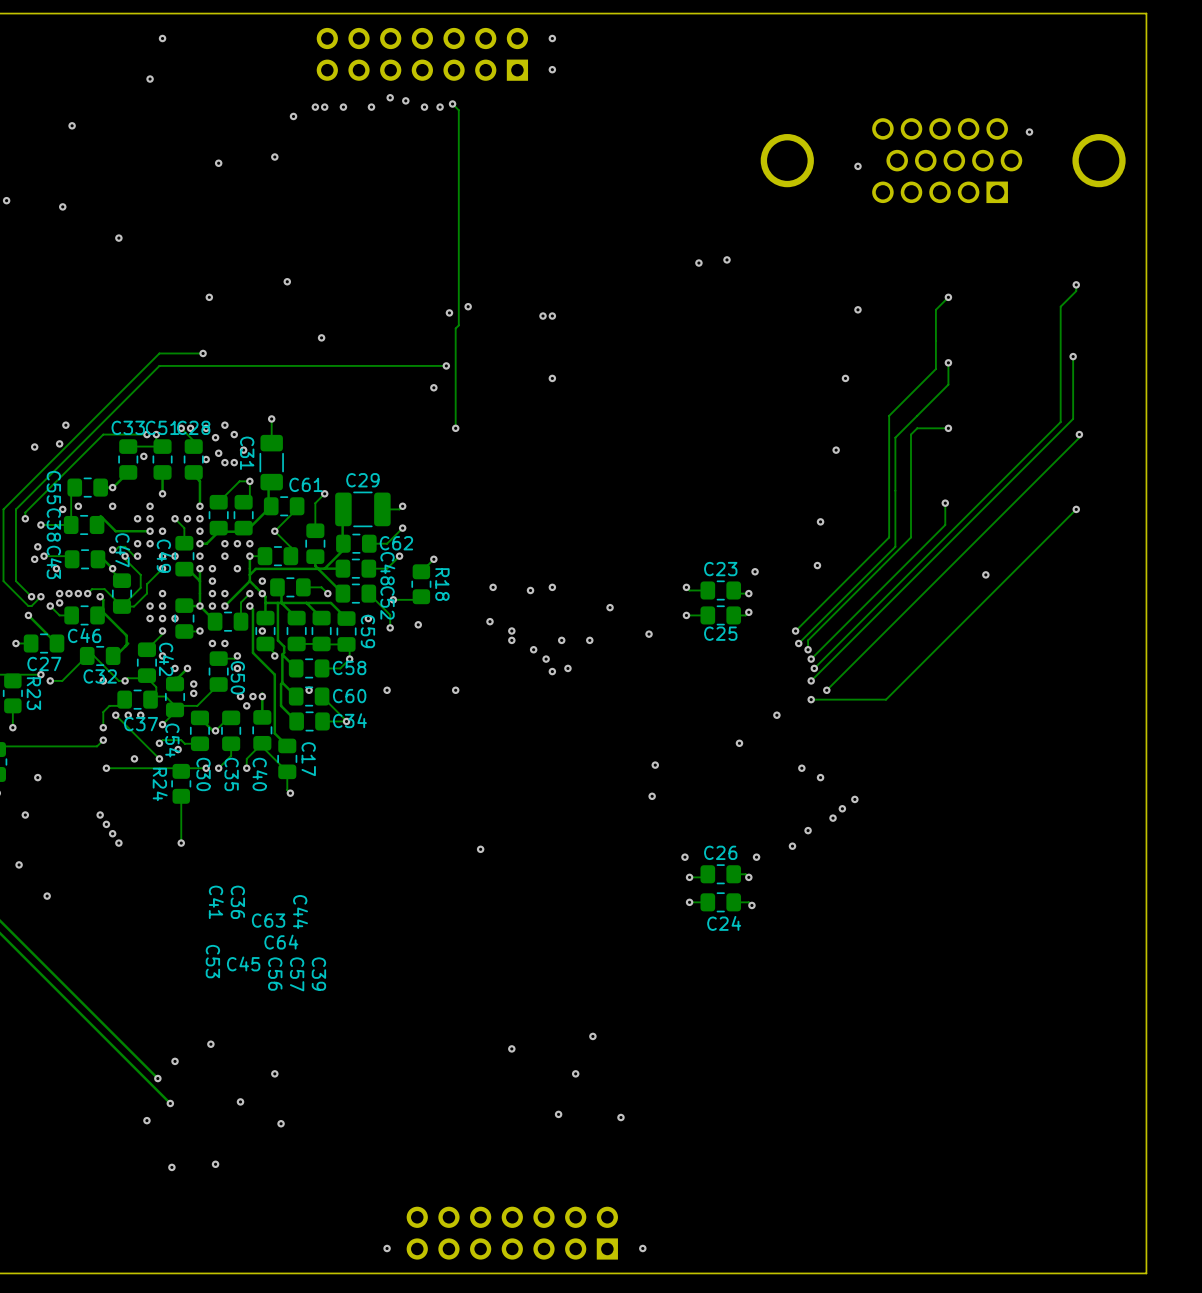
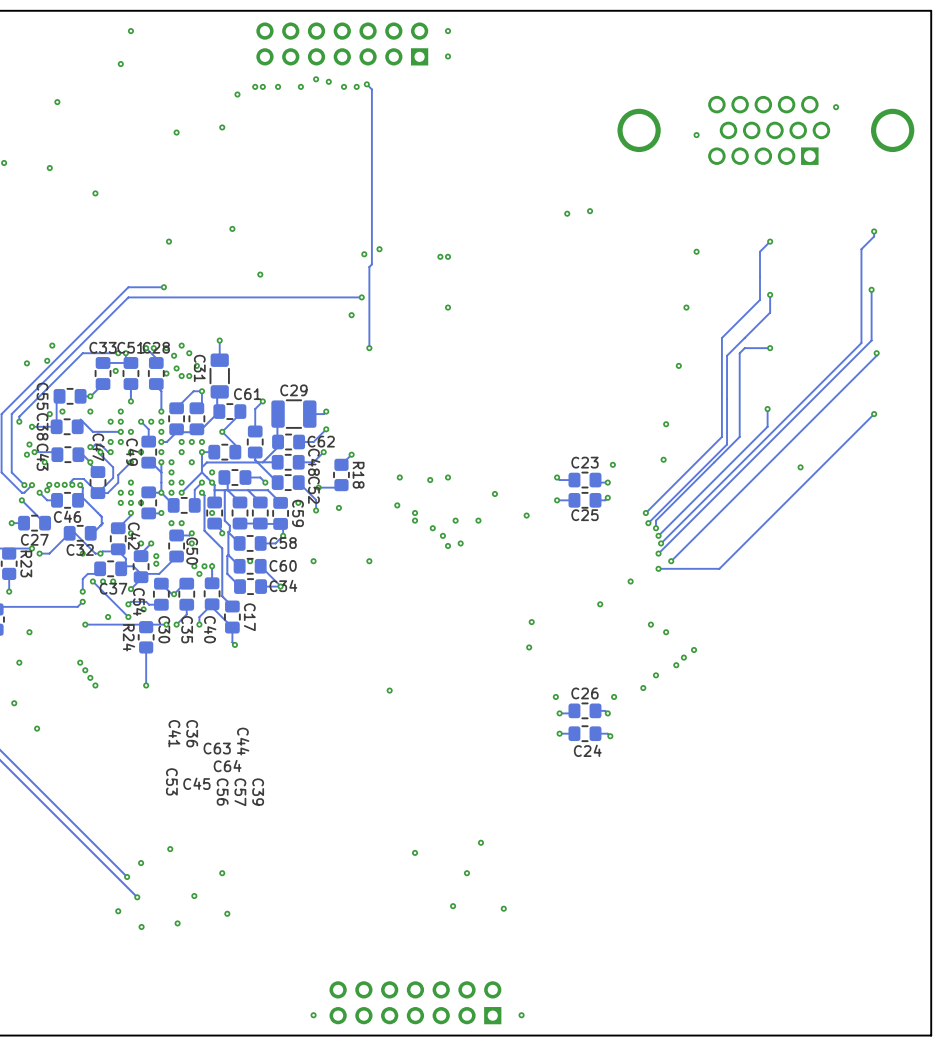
via: (59, 593) -> none
via: (68, 593) -> none
via: (78, 593) -> none
via: (87, 593) -> none
via: none -> (49, 484)
via: none -> (57, 484)
via: none -> (64, 484)
via: none -> (72, 484)
via: none -> (177, 923)
via: none -> (141, 926)
via: (215, 1164) -> none
via: (171, 1167) -> none

